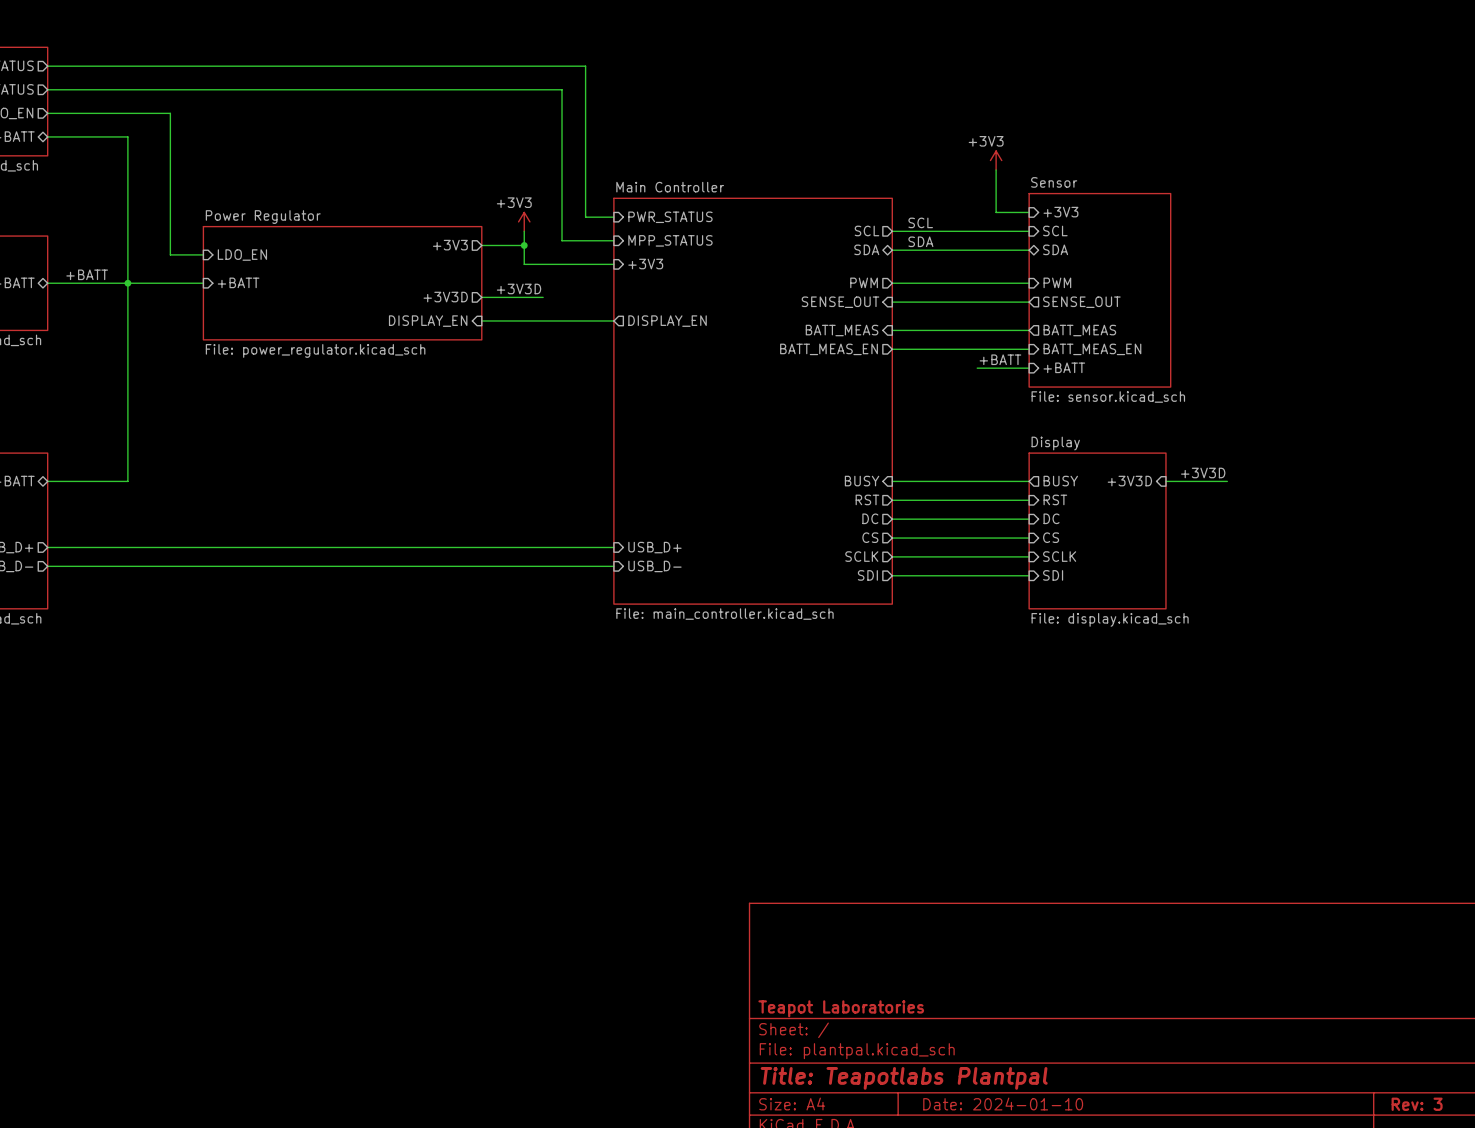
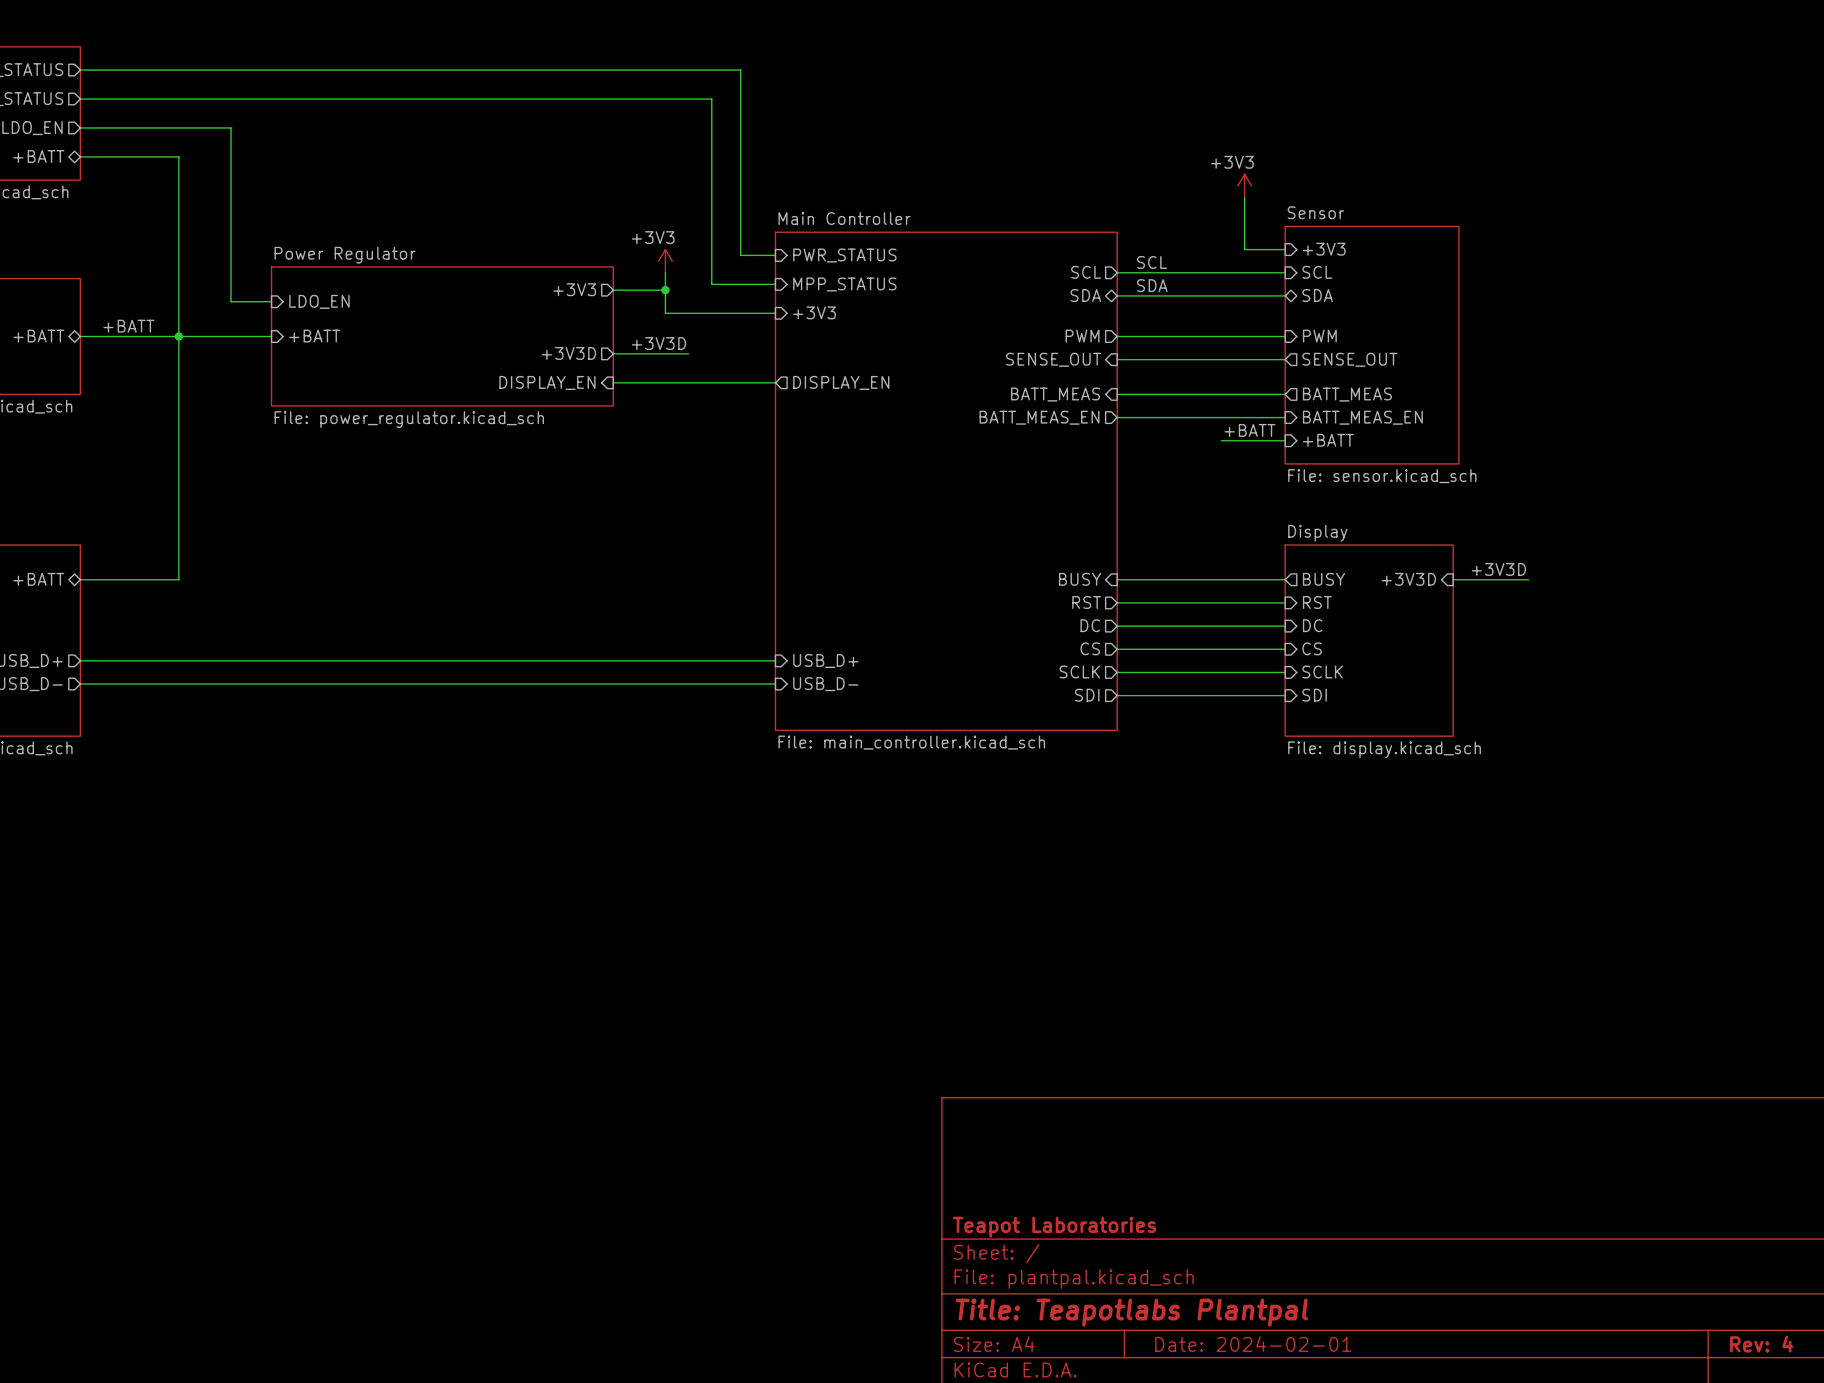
title block: Date: 2024-01-10 (1003, 1104) -> Date: 2024-02-01 (1253, 1344)
title block: Rev: 3 (1417, 1104) -> Rev: 4 (1761, 1344)

